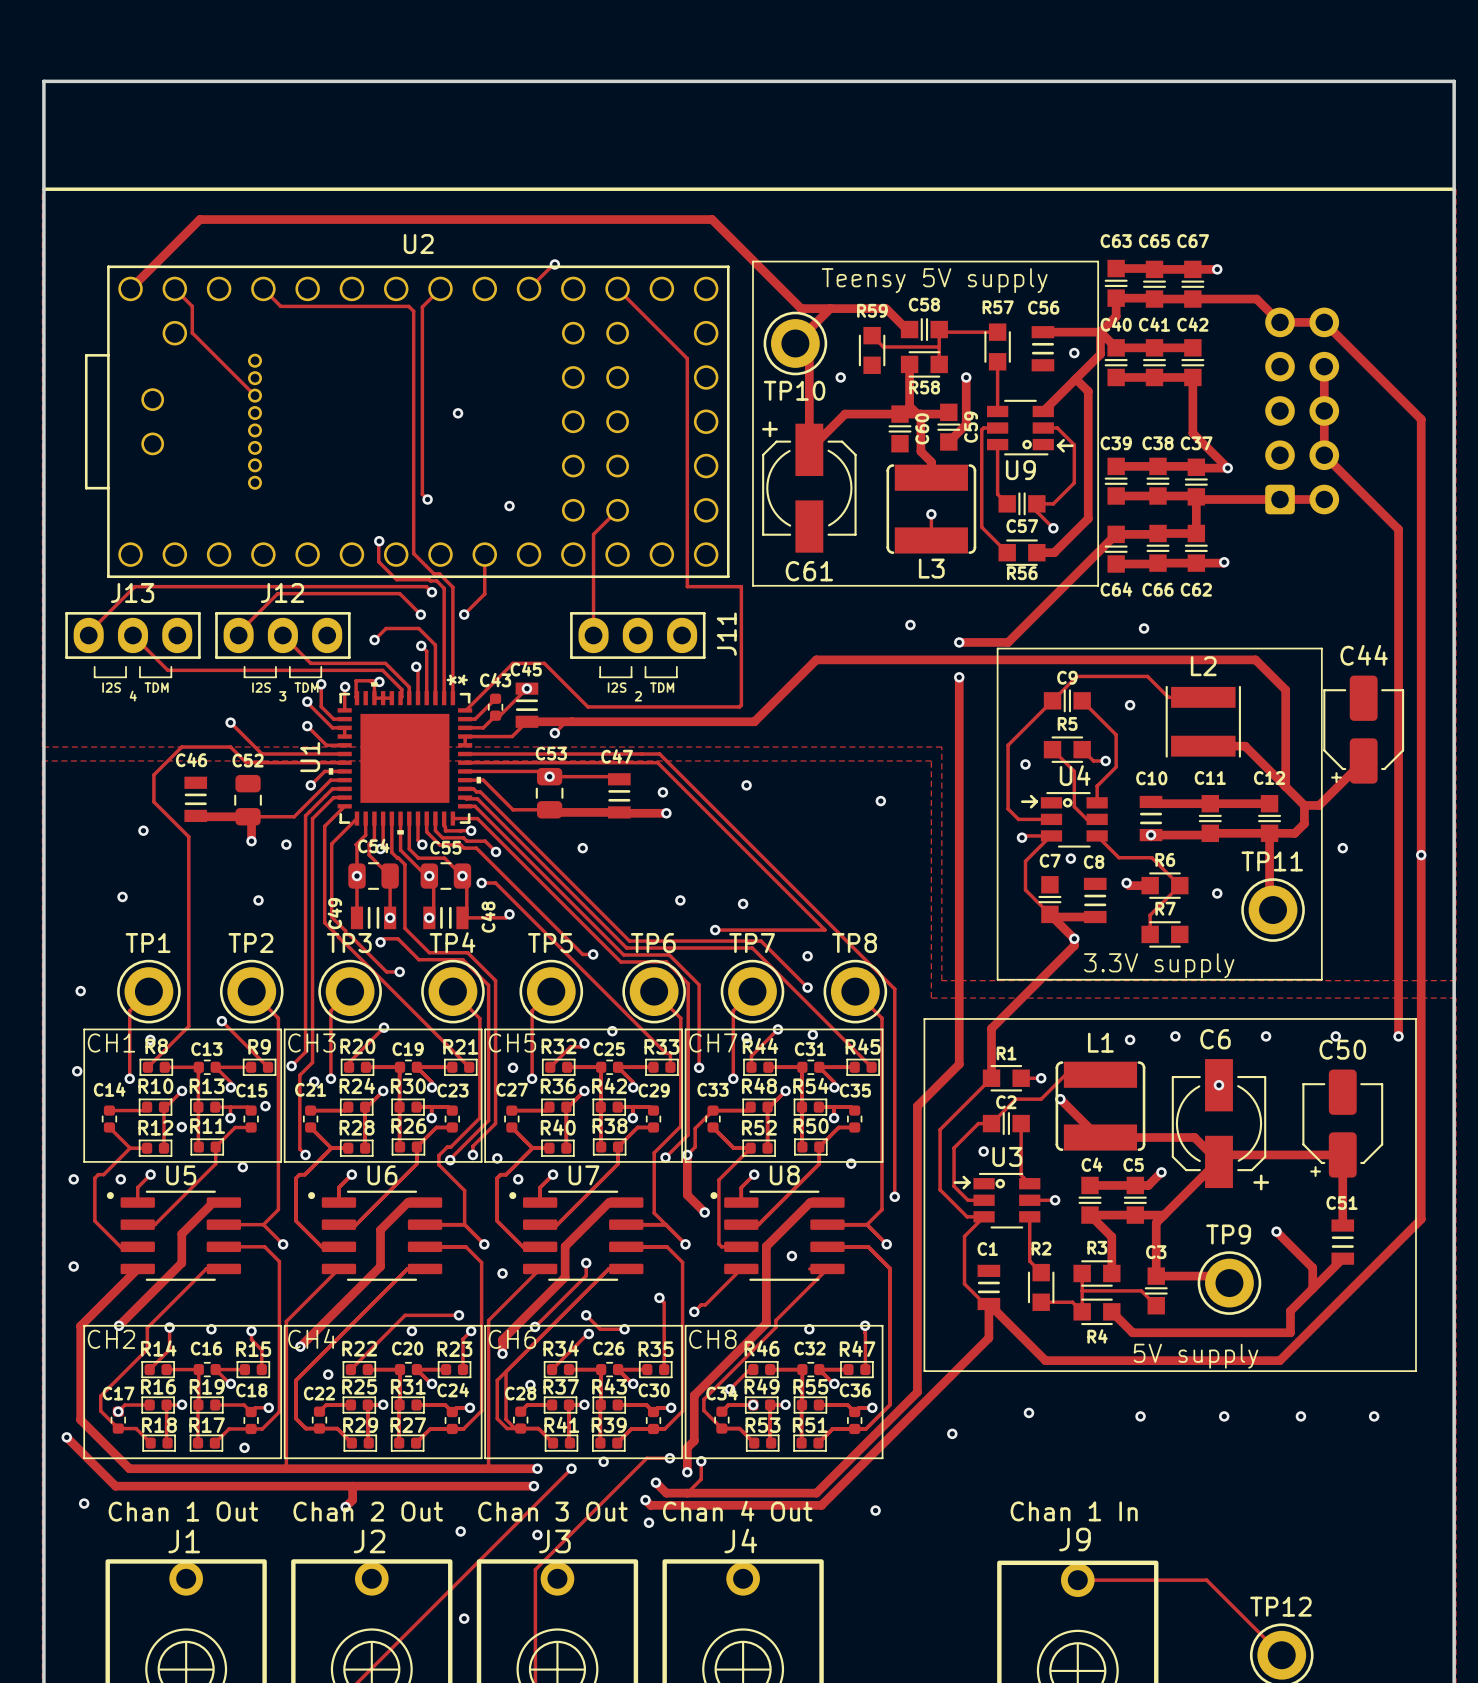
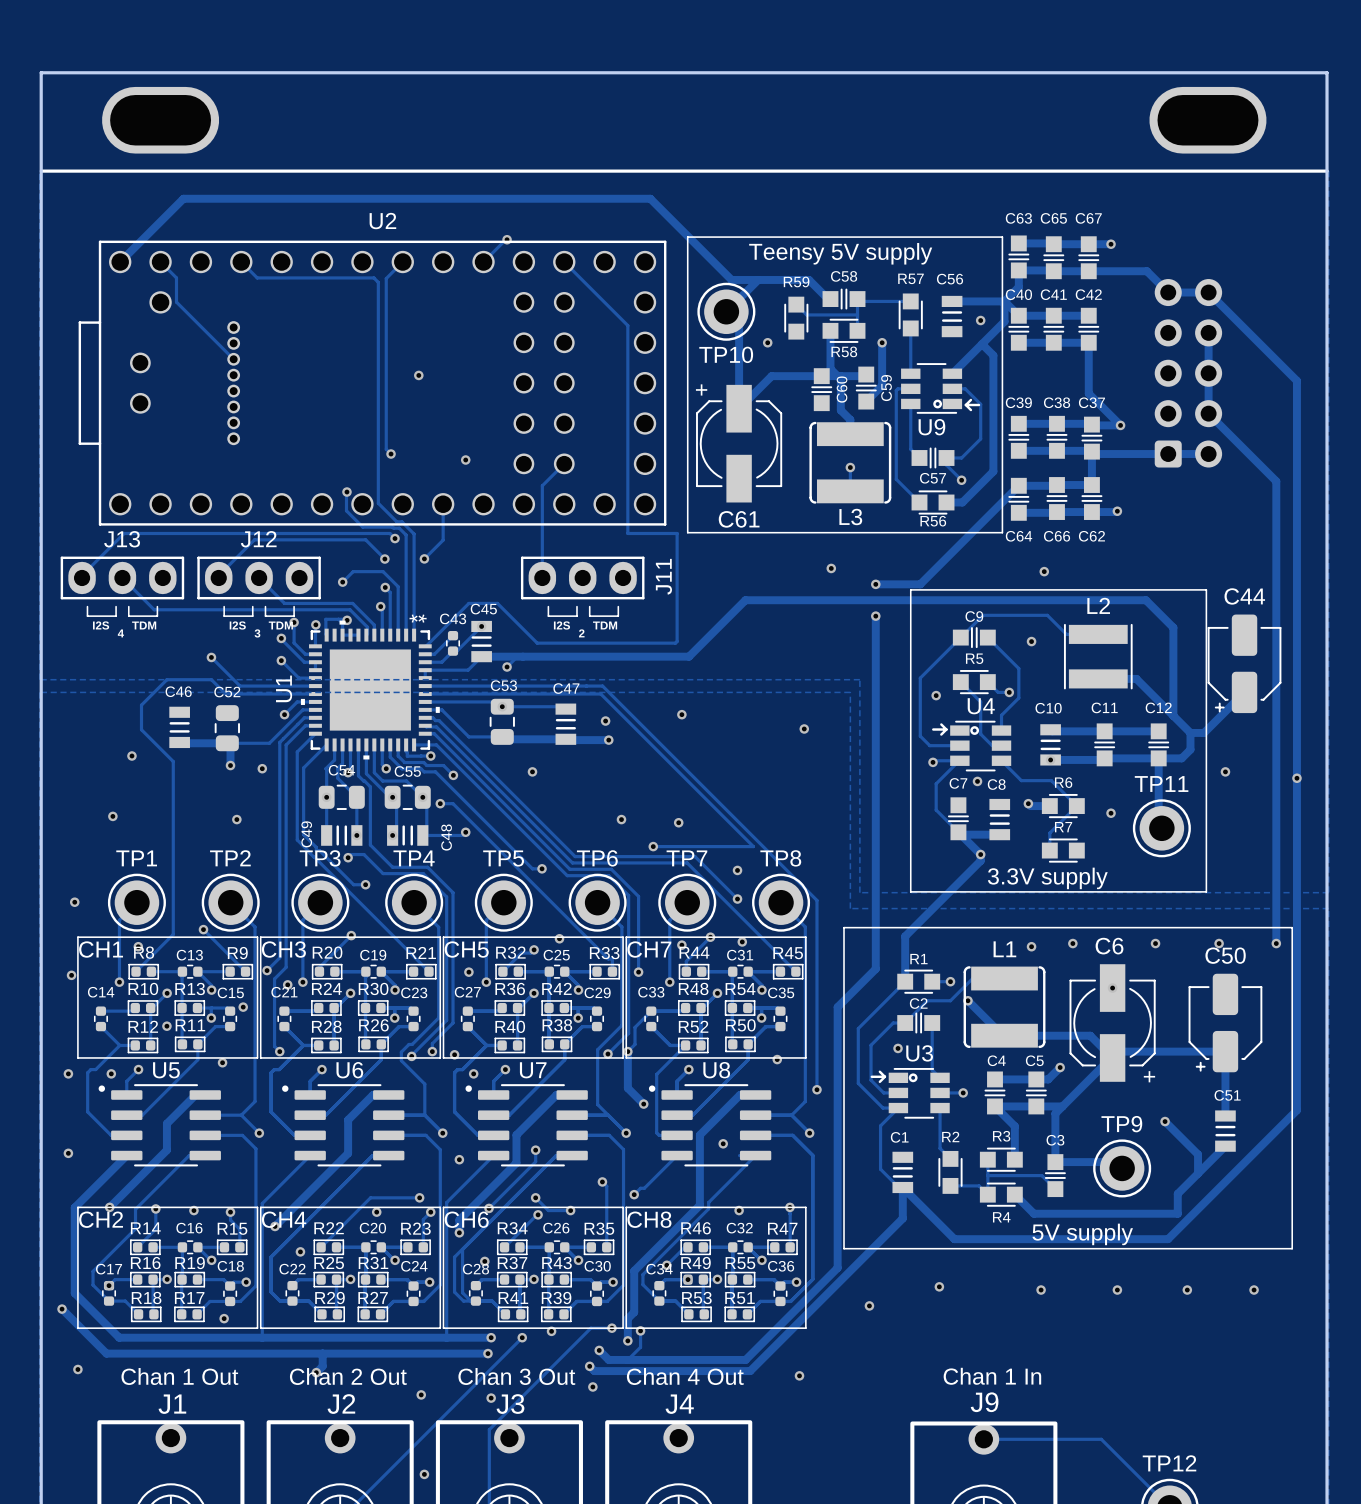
part: none -> (160, 120)
part: none -> (1207, 120)

